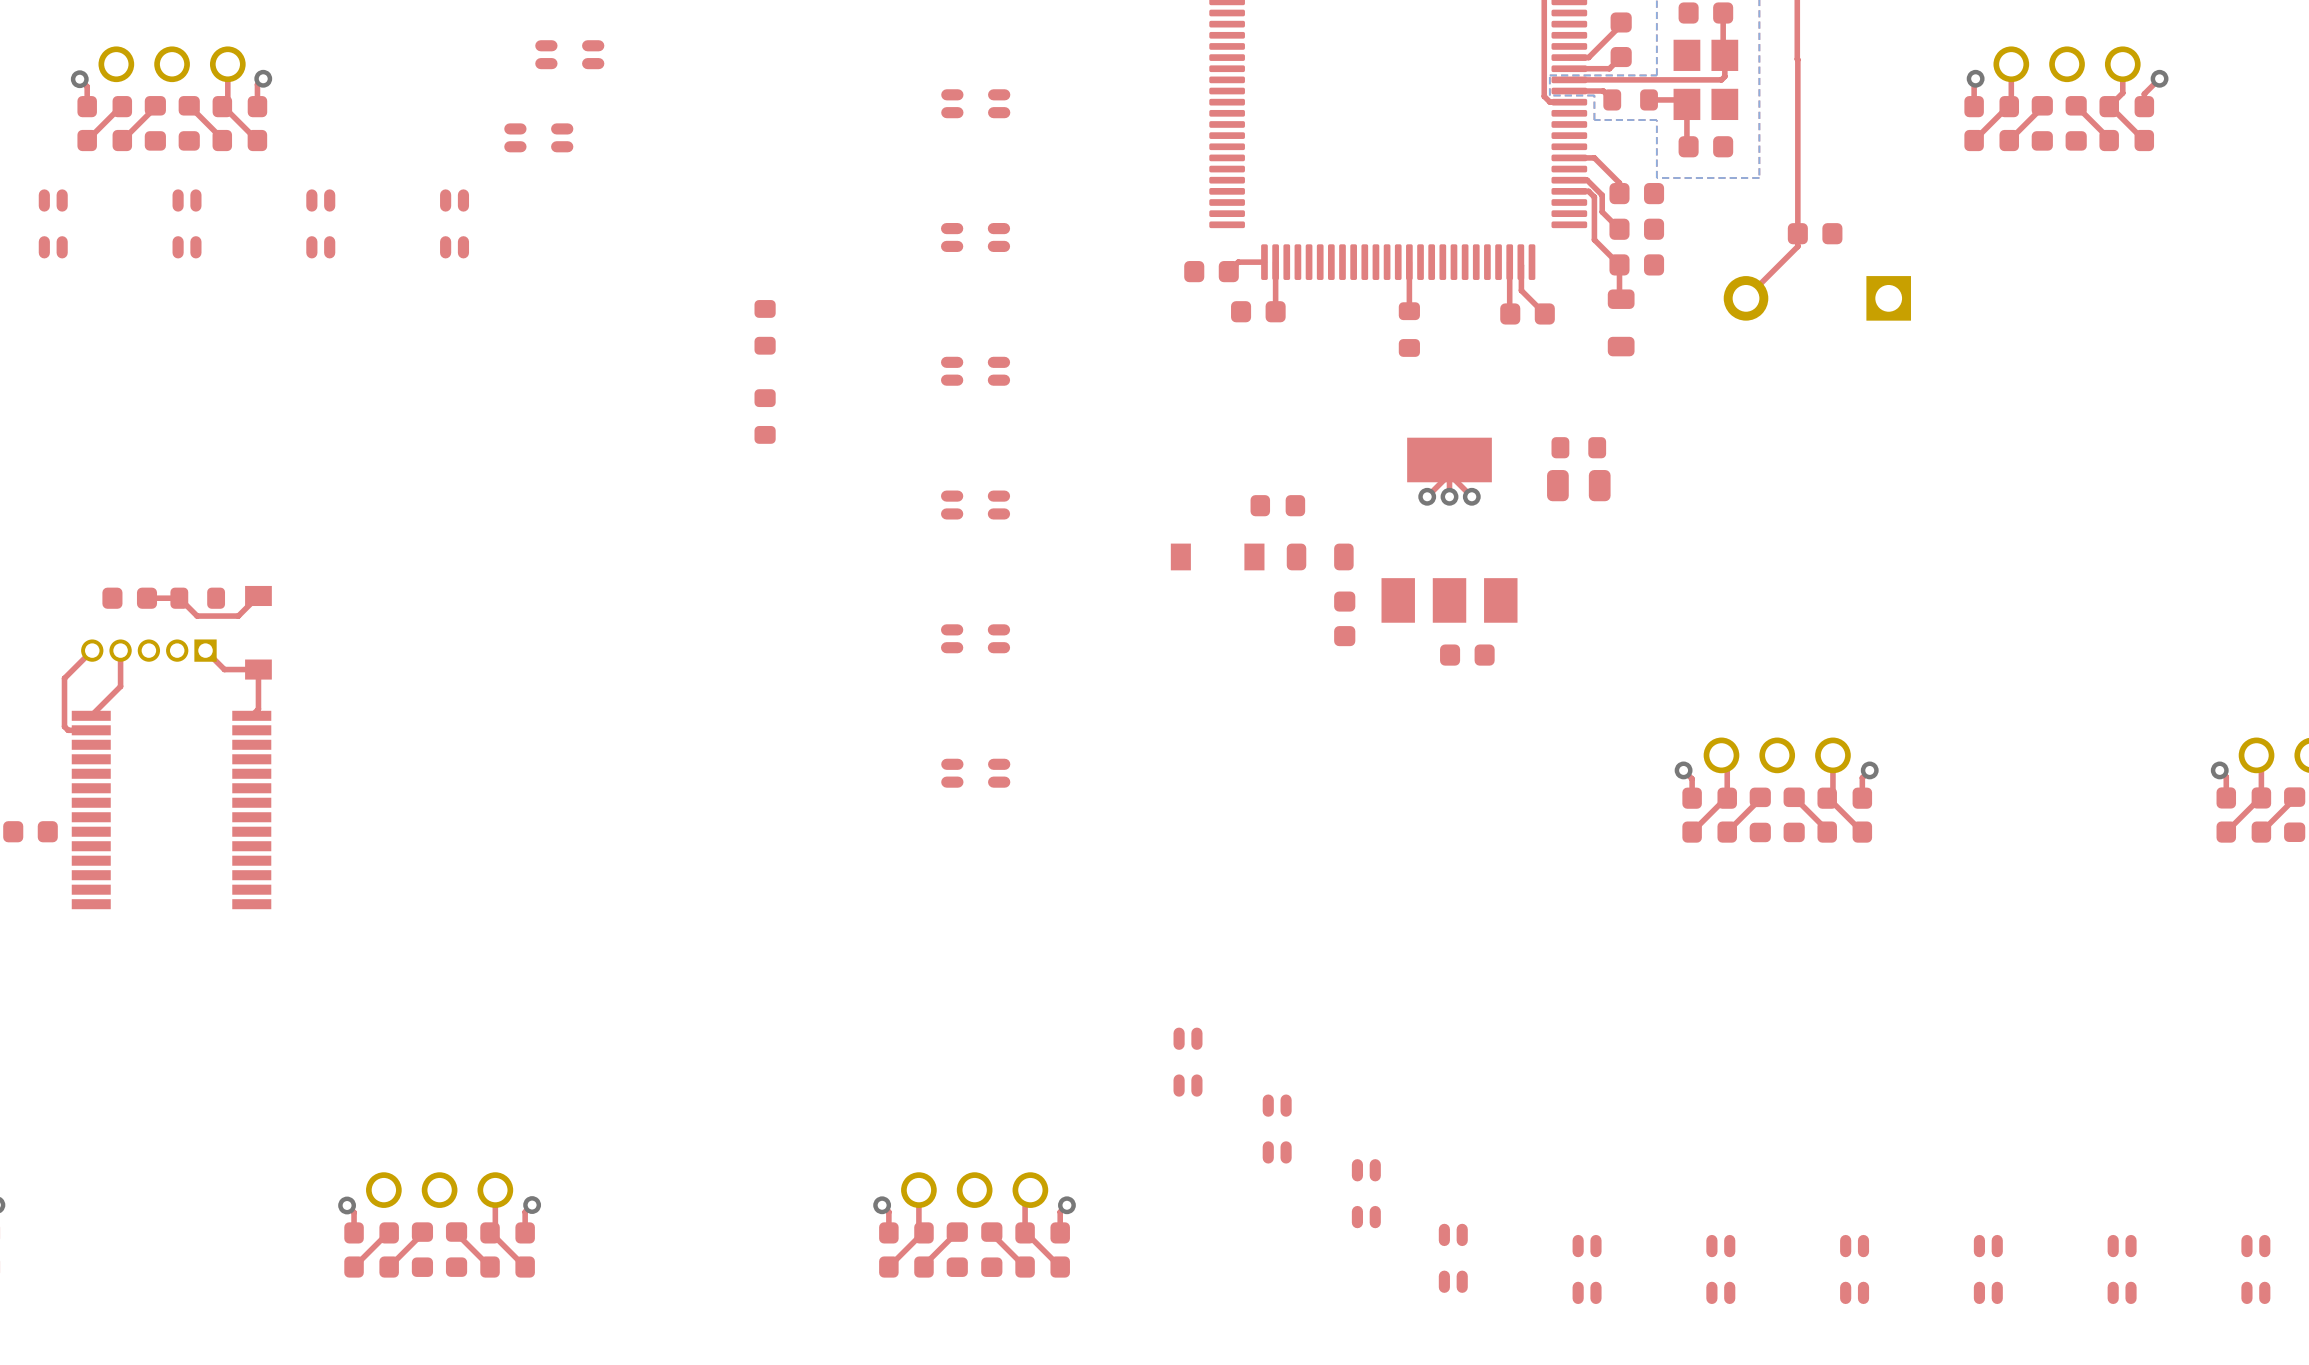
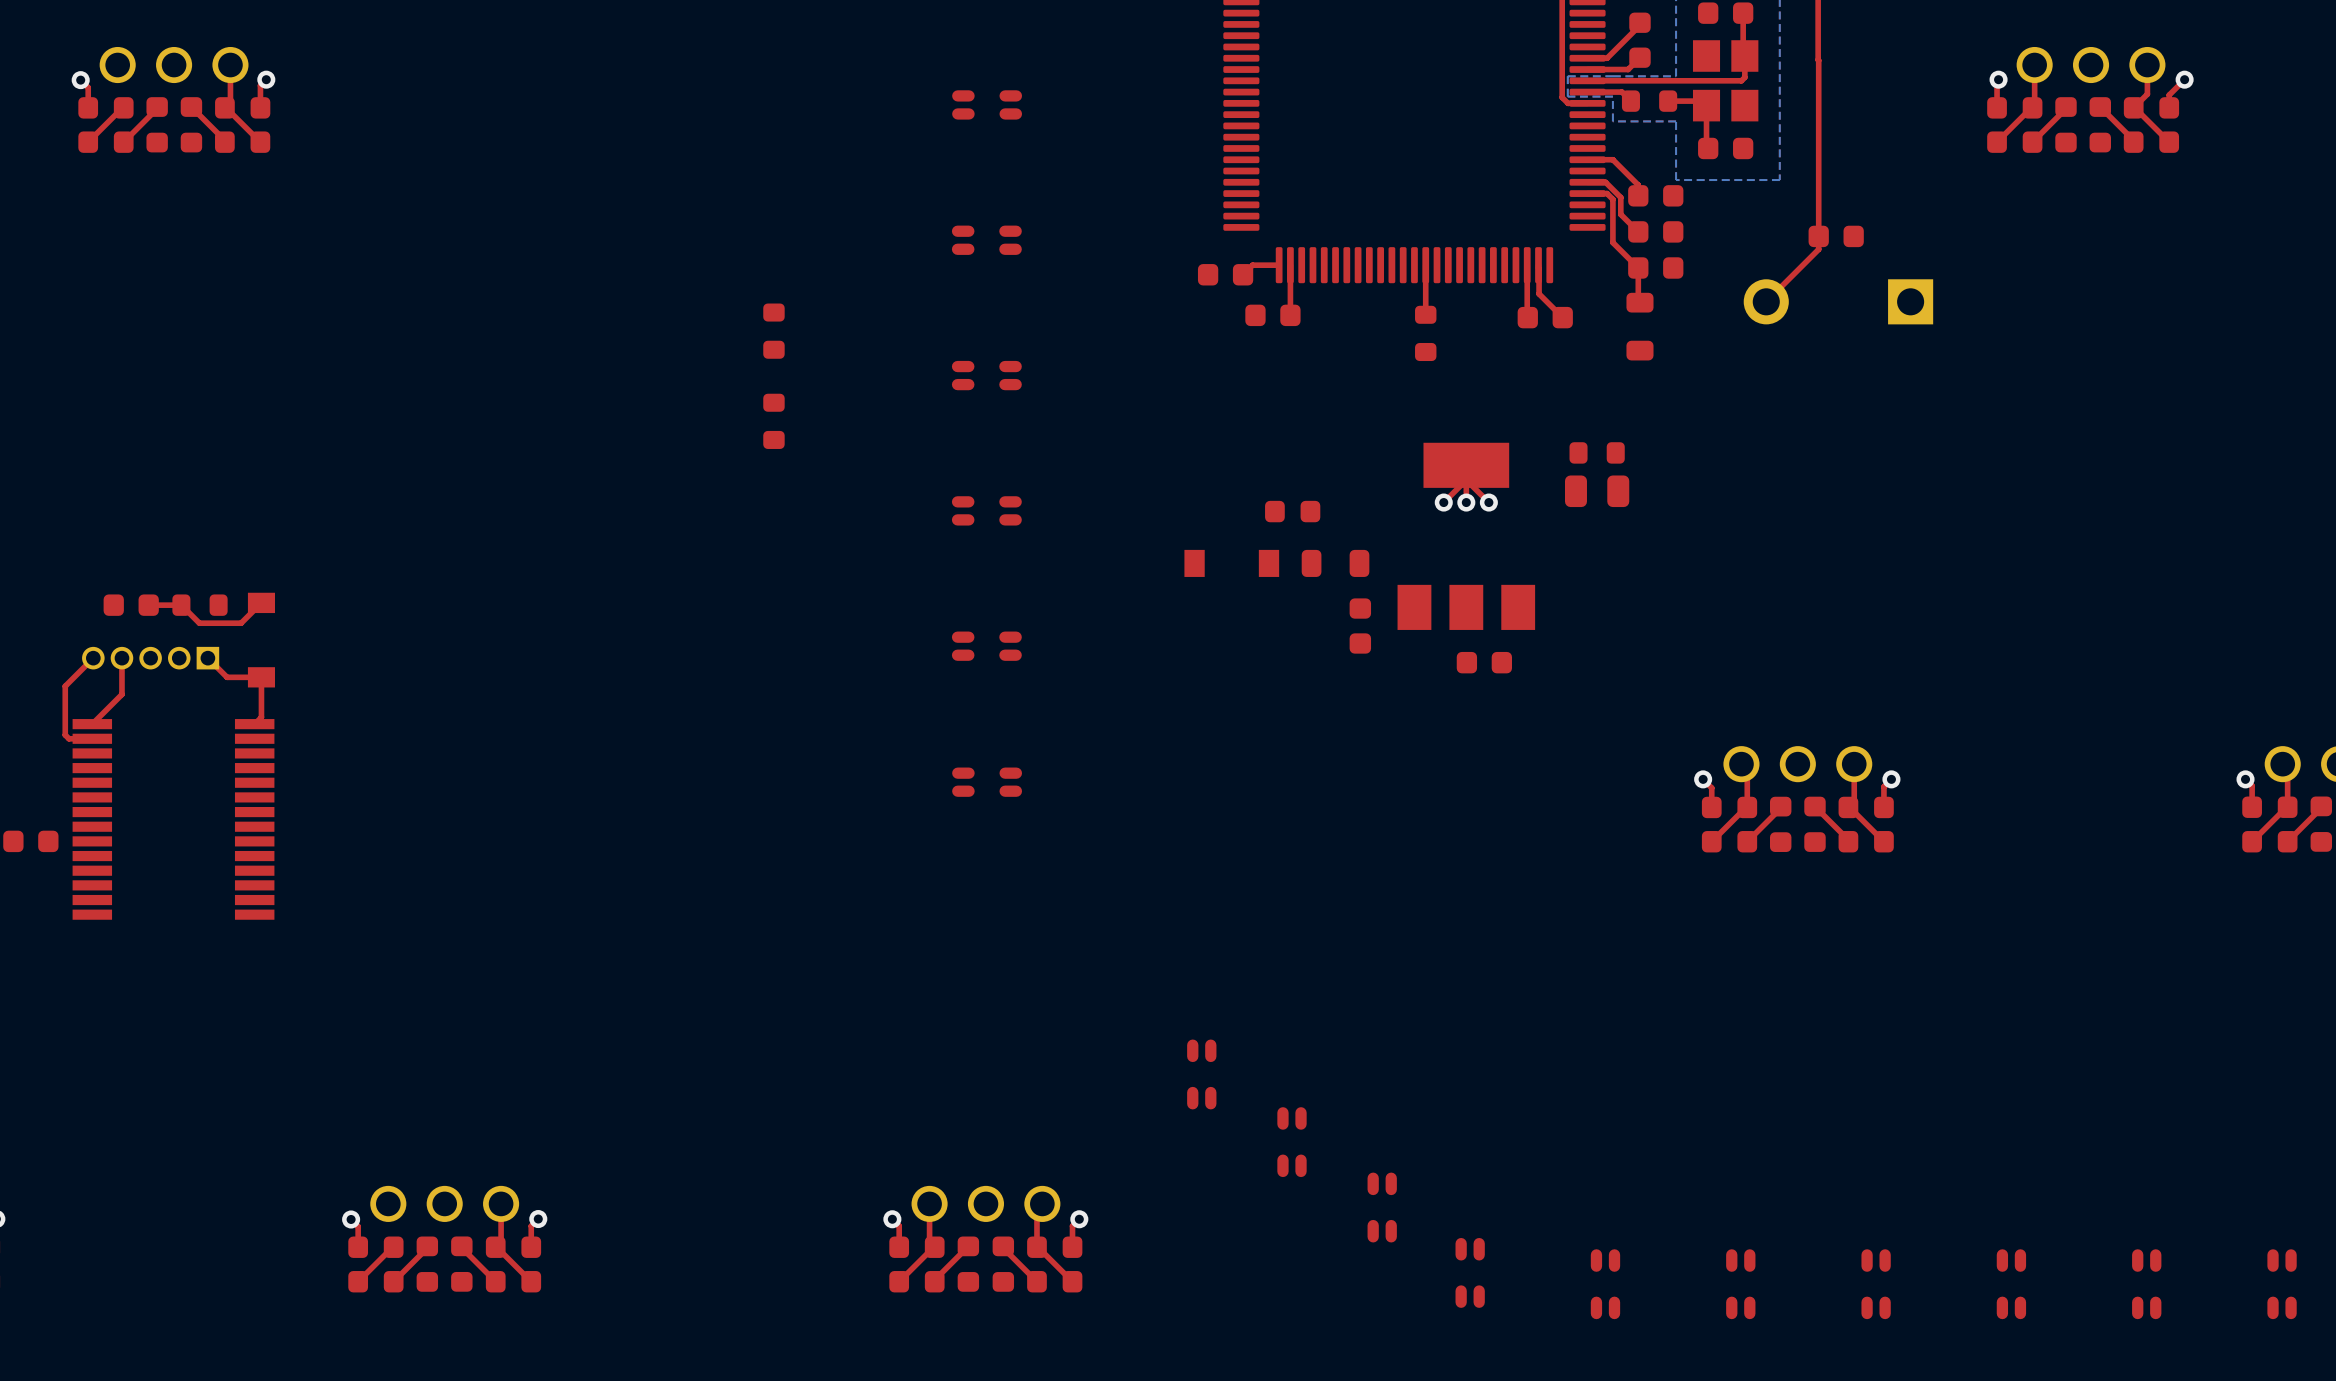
part: (569, 54) -> none
part: (538, 137) -> none
part: (53, 223) -> none
part: (187, 223) -> none
part: (320, 223) -> none
part: (454, 223) -> none

